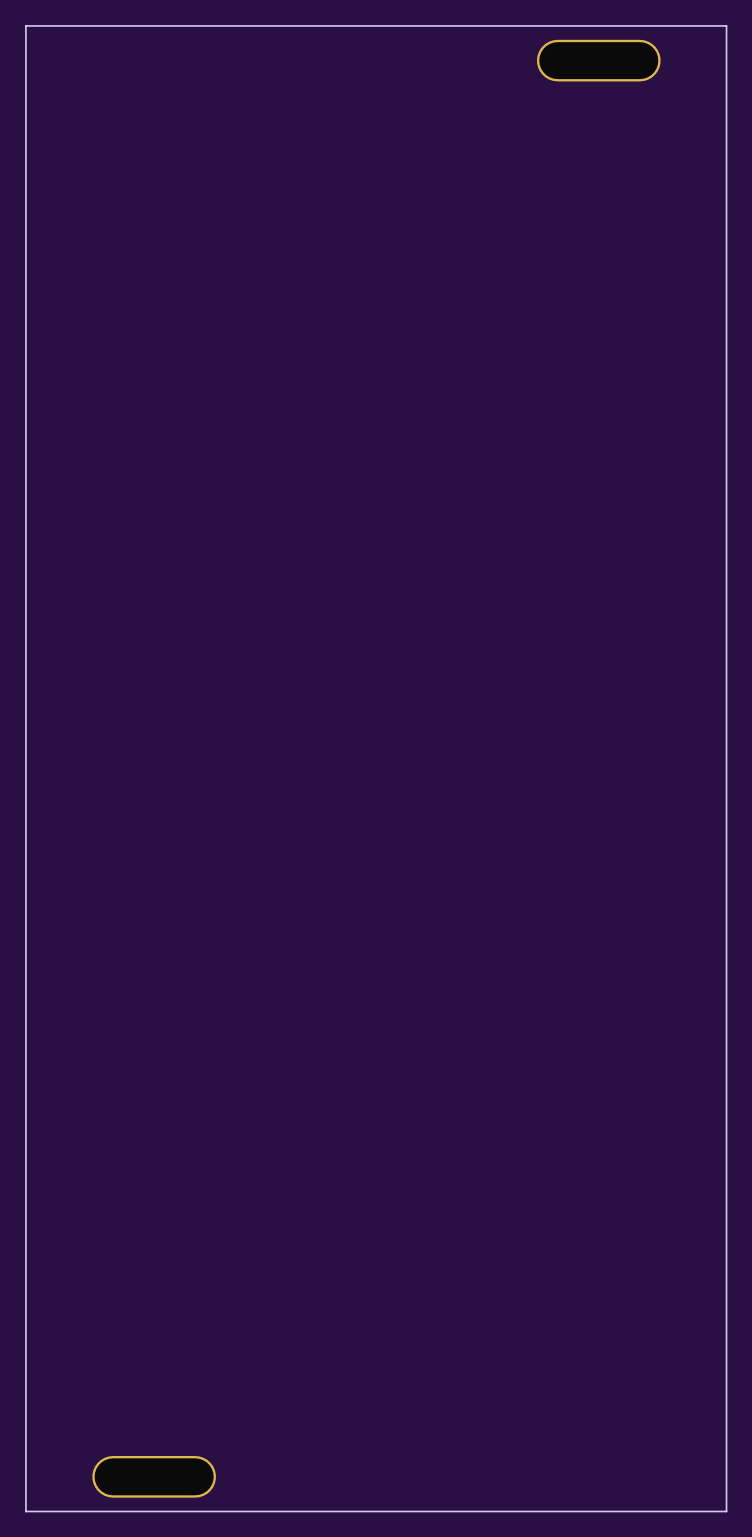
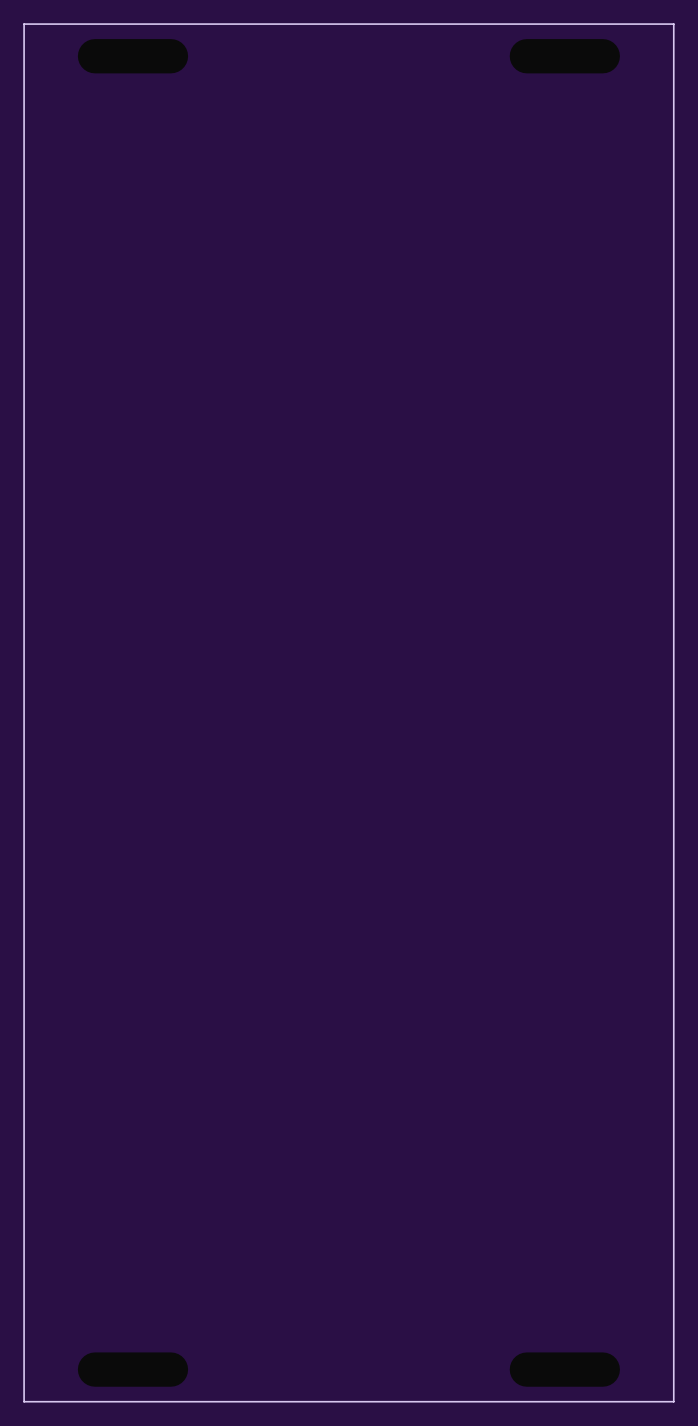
part footprint: [536, 39, 661, 82] -> [509, 39, 620, 74]
part: none -> (132, 56)
part footprint: [92, 1456, 217, 1498] -> [77, 1352, 189, 1387]
part: none -> (564, 1369)

